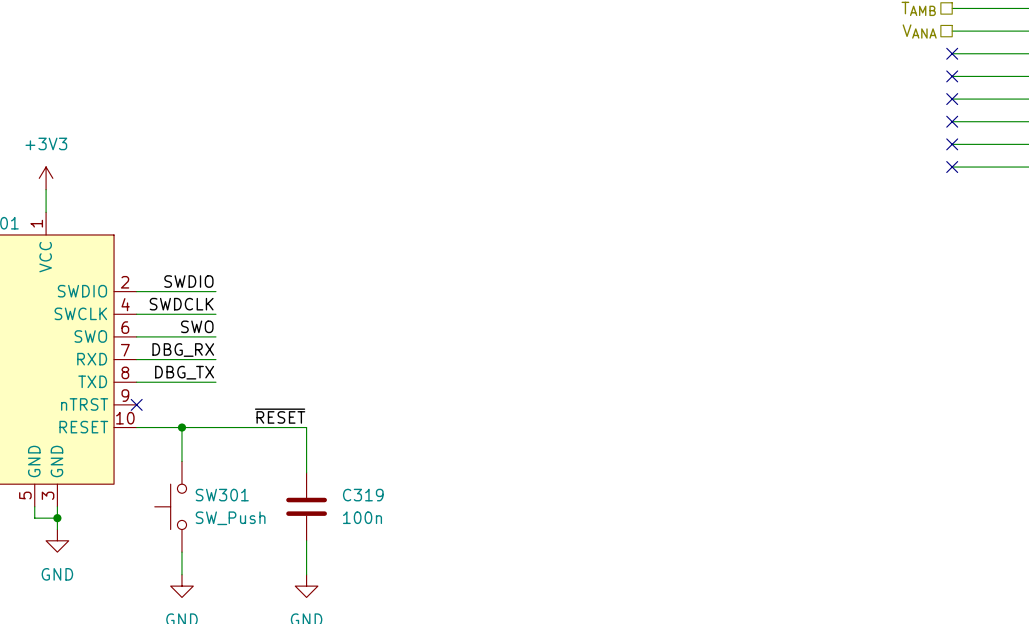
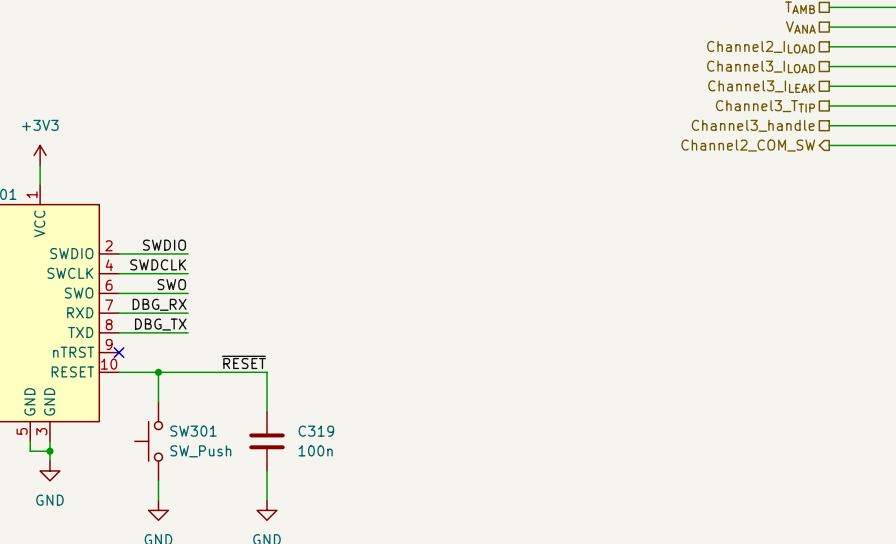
no-connect mark: (952, 53) -> none
hierarchical label: none -> Channel2_ILOAD (761, 47)
hierarchical label: none -> Channel3_ILOAD (761, 66)
no-connect mark: (952, 76) -> none
hierarchical label: none -> Channel3_ILEAK (761, 86)
no-connect mark: (952, 99) -> none
no-connect mark: (952, 121) -> none
hierarchical label: none -> Channel3_TTIP (765, 106)
hierarchical label: none -> Channel3_handle (753, 125)
no-connect mark: (952, 144) -> none
hierarchical label: none -> Channel2_COM_SW (748, 145)
no-connect mark: (952, 167) -> none

